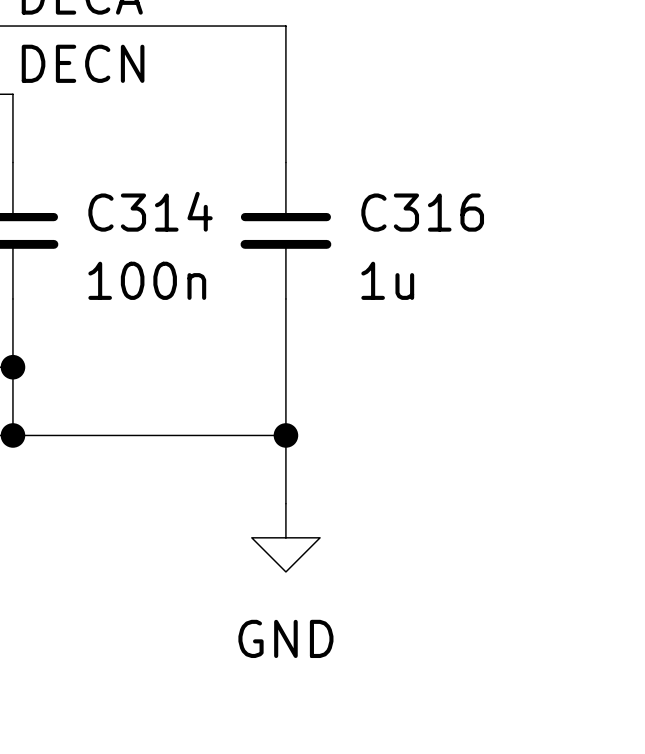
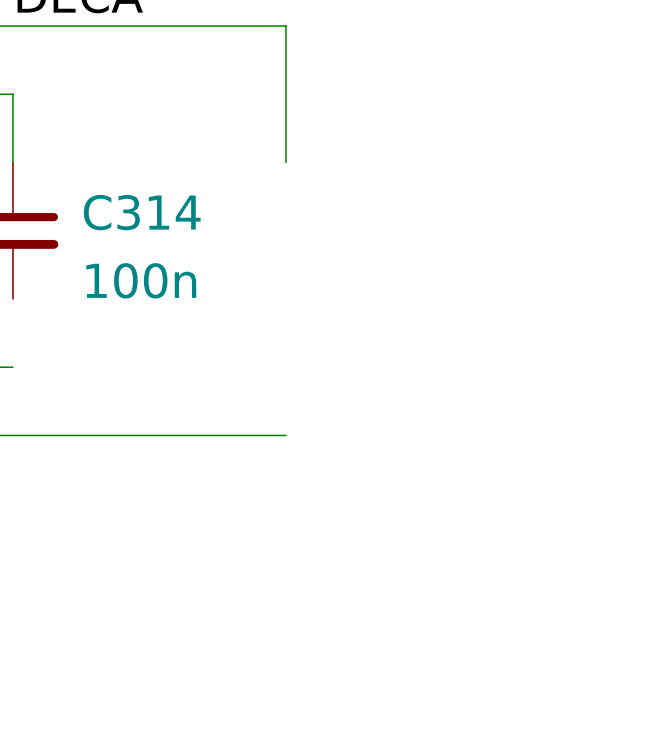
label: DECN (83, 63) -> none
C316: 1u (285, 230) -> none
wire: (12, 298) (12, 435) -> none
wire: (285, 298) (285, 503) -> none
junction: (12, 367) -> none
junction: (12, 435) -> none
junction: (285, 435) -> none
power symbol: GND (285, 537) -> none

